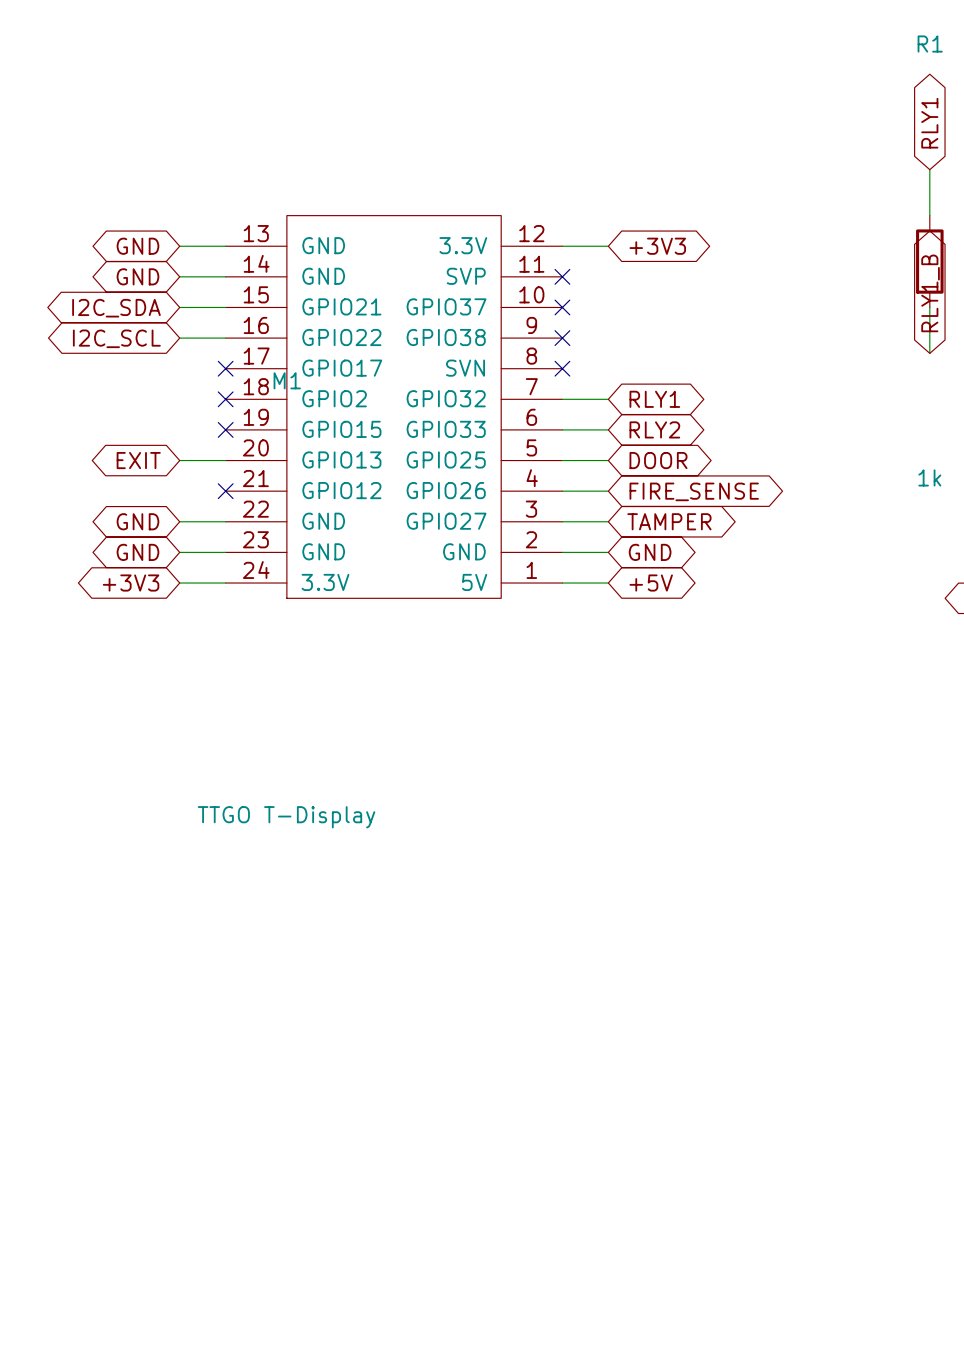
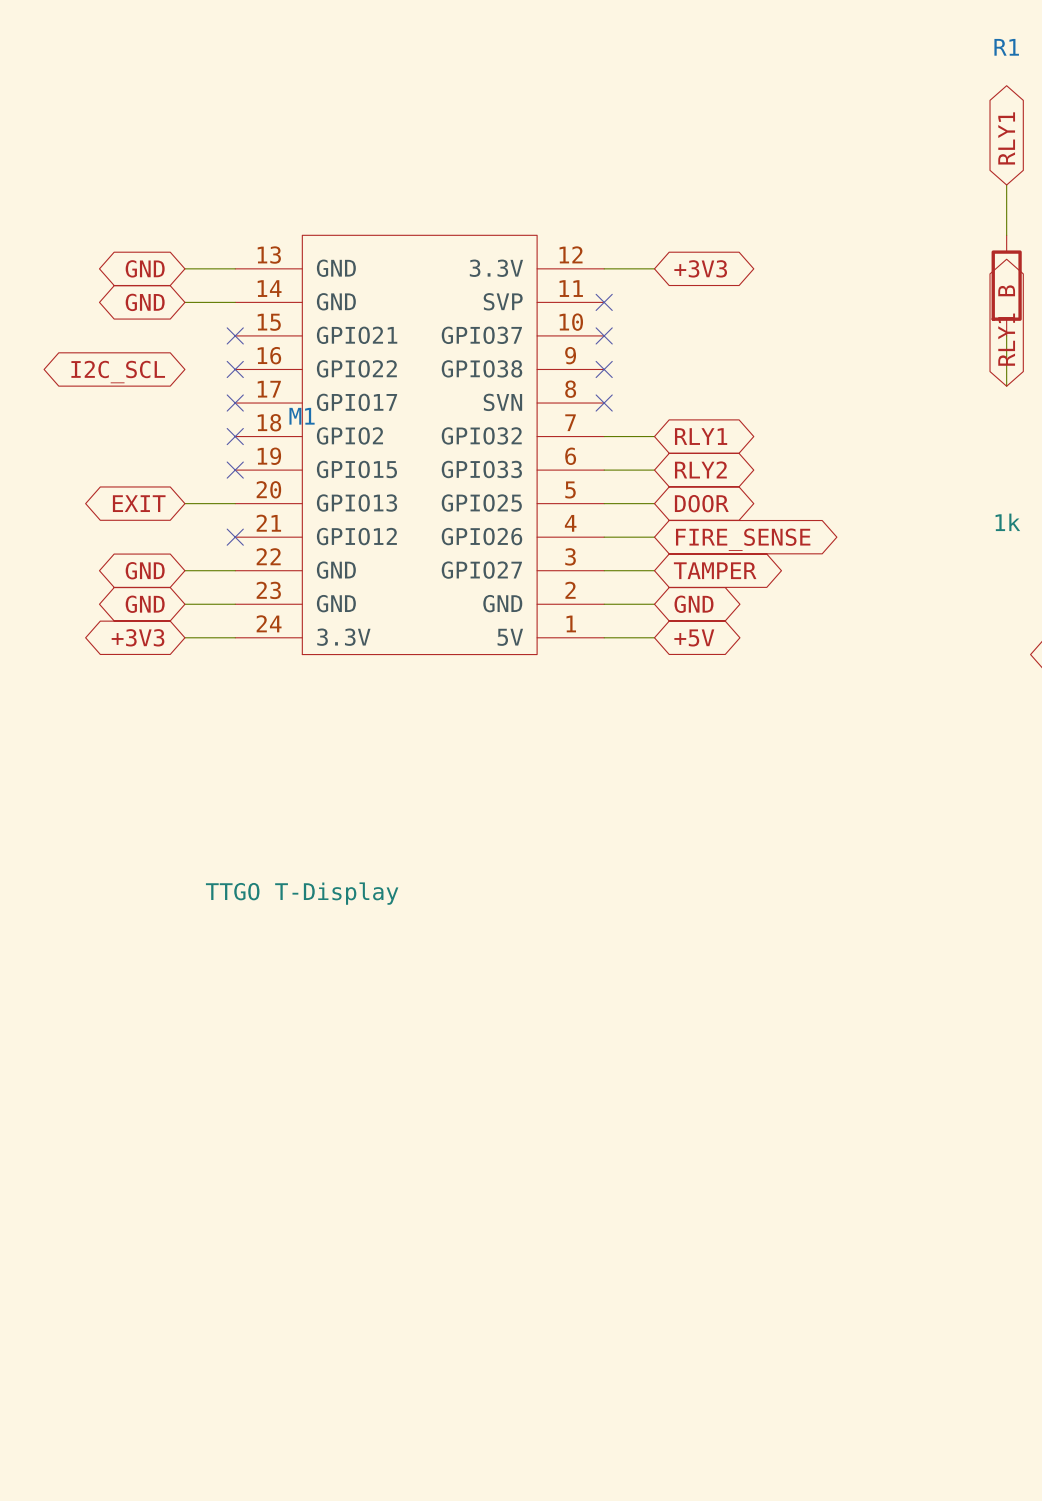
wire: (179, 307) (225, 307) -> none
no-connect mark: none -> (235, 335)
global label: I2C_SDA (116, 308) -> none
wire: (179, 338) (225, 338) -> none
no-connect mark: none -> (235, 369)

